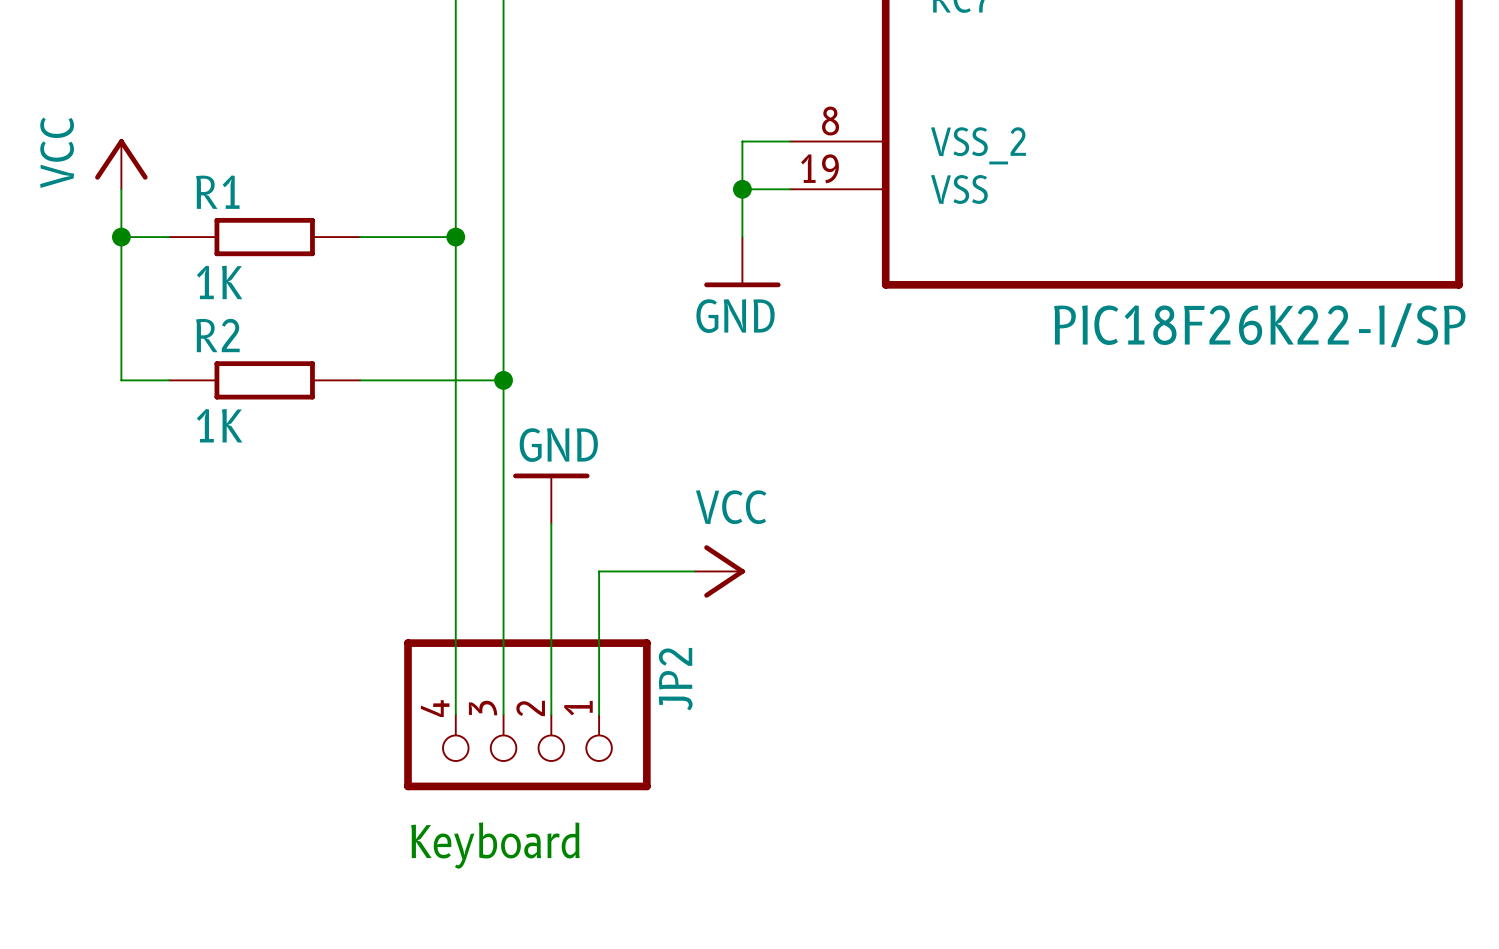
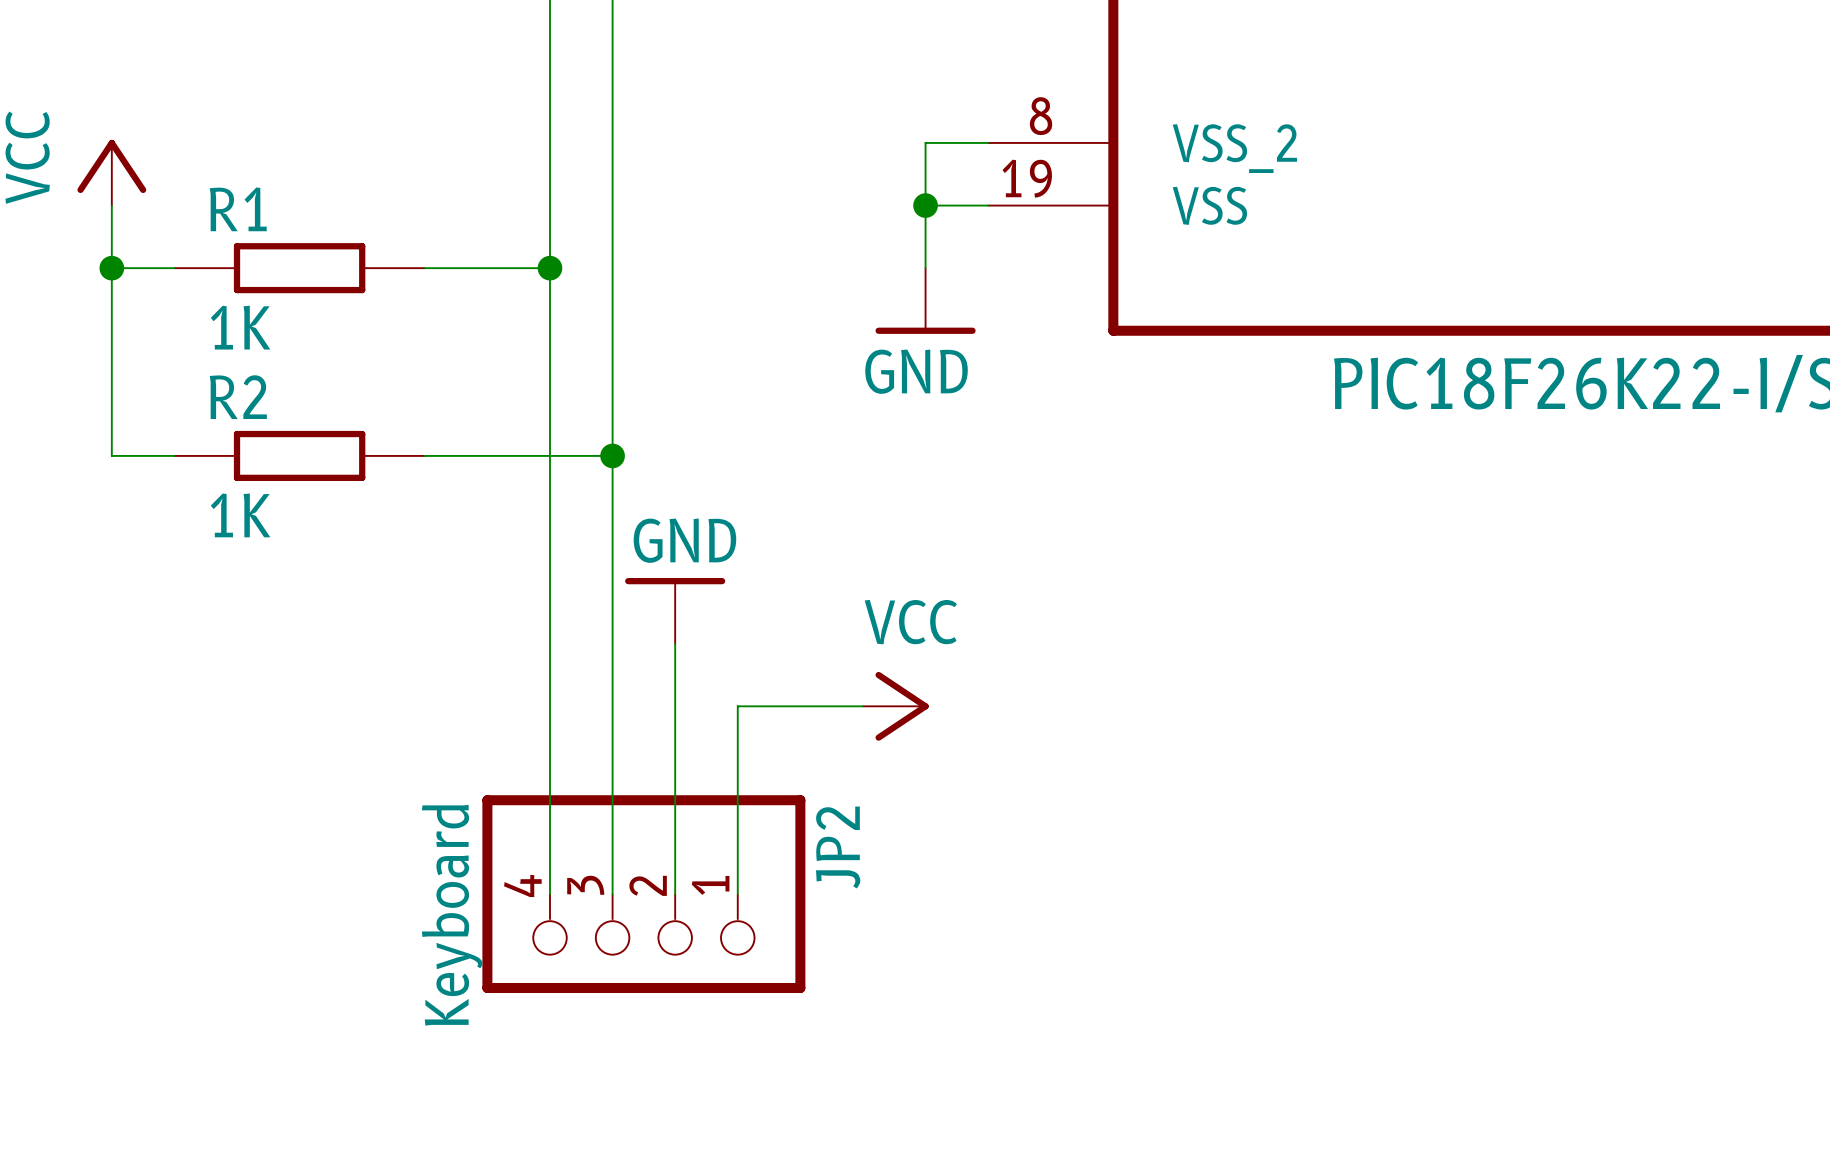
JP2 value: none -> Keyboard (452, 915)
text: Keyboard (495, 845) -> none

